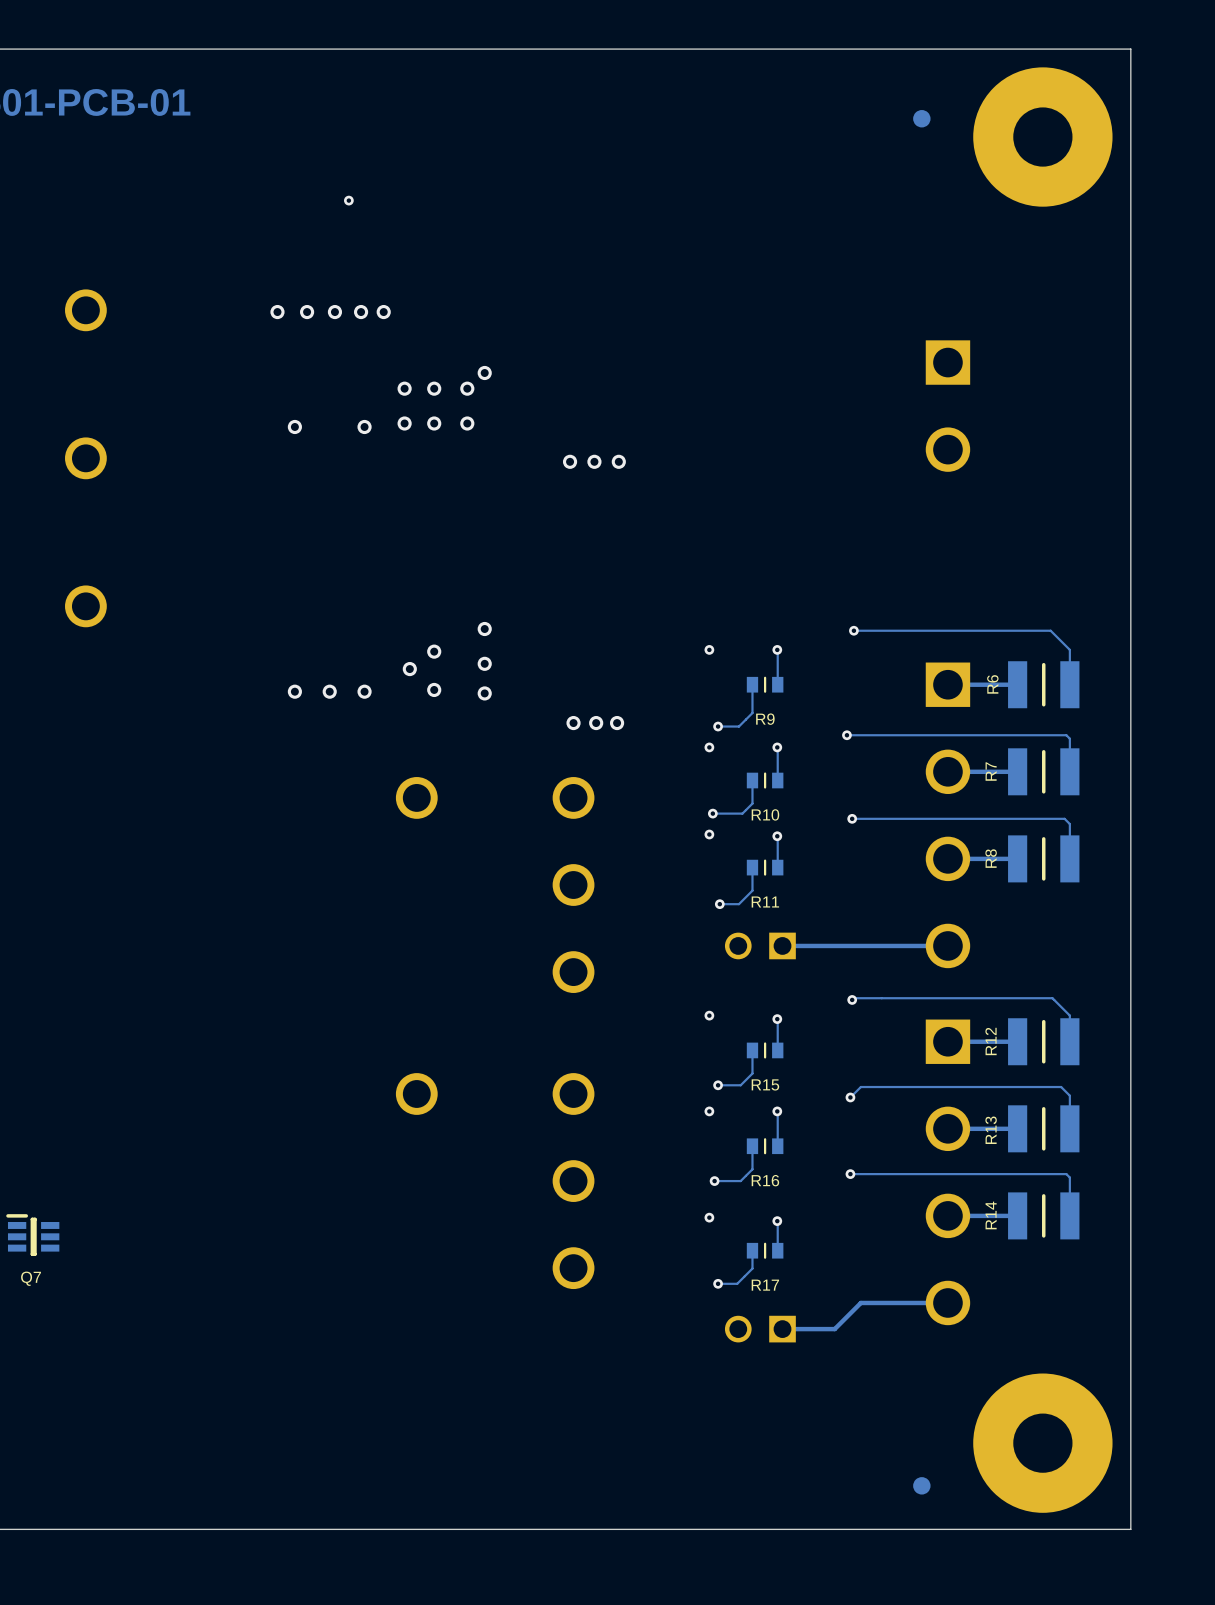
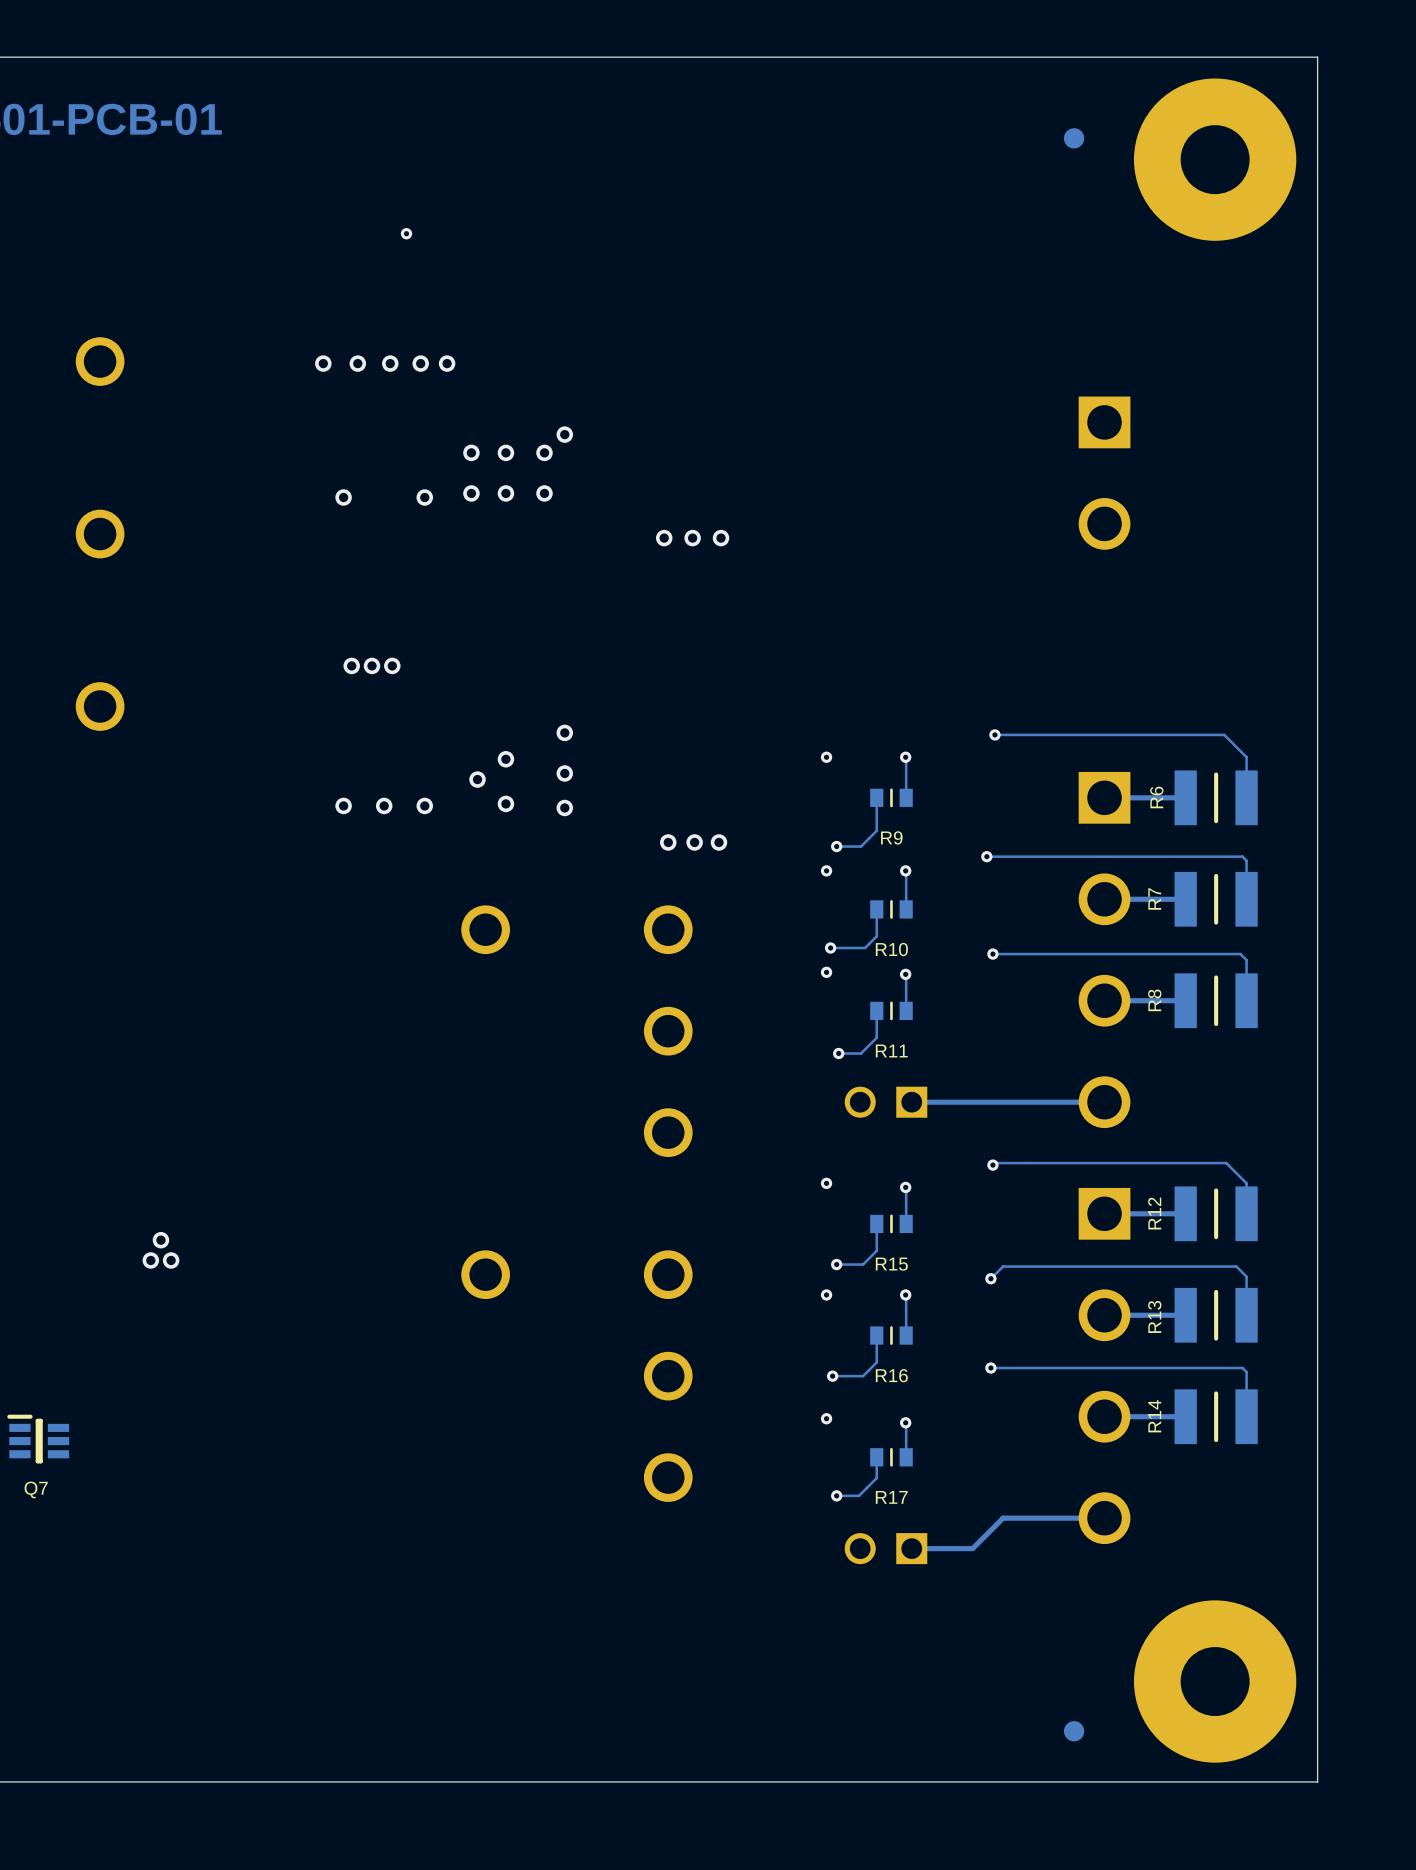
via: none -> (351, 665)
via: none -> (372, 665)
via: none -> (392, 665)
via: none -> (160, 1240)
via: none -> (150, 1260)
via: none -> (171, 1260)

